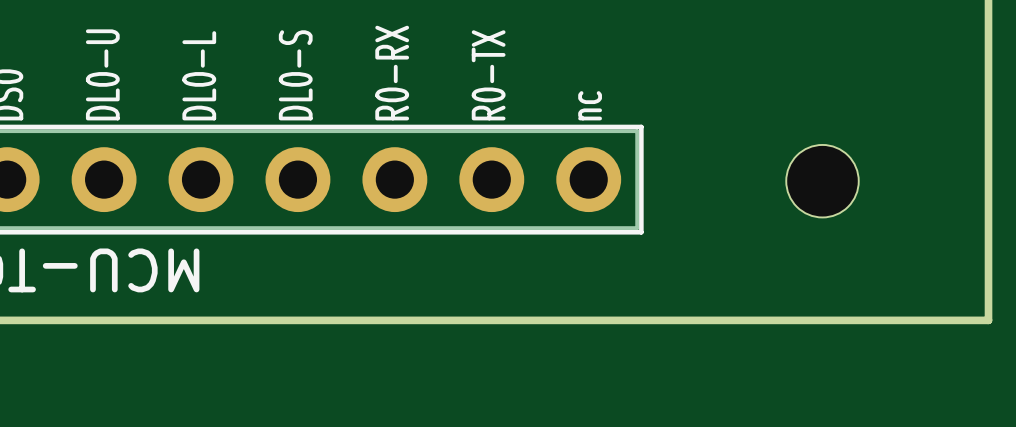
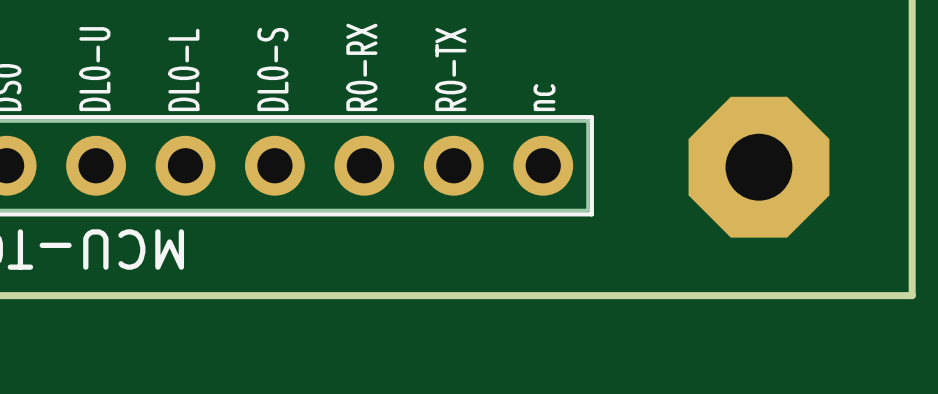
part footprint: [786, 144, 859, 218] -> [688, 96, 830, 238]

